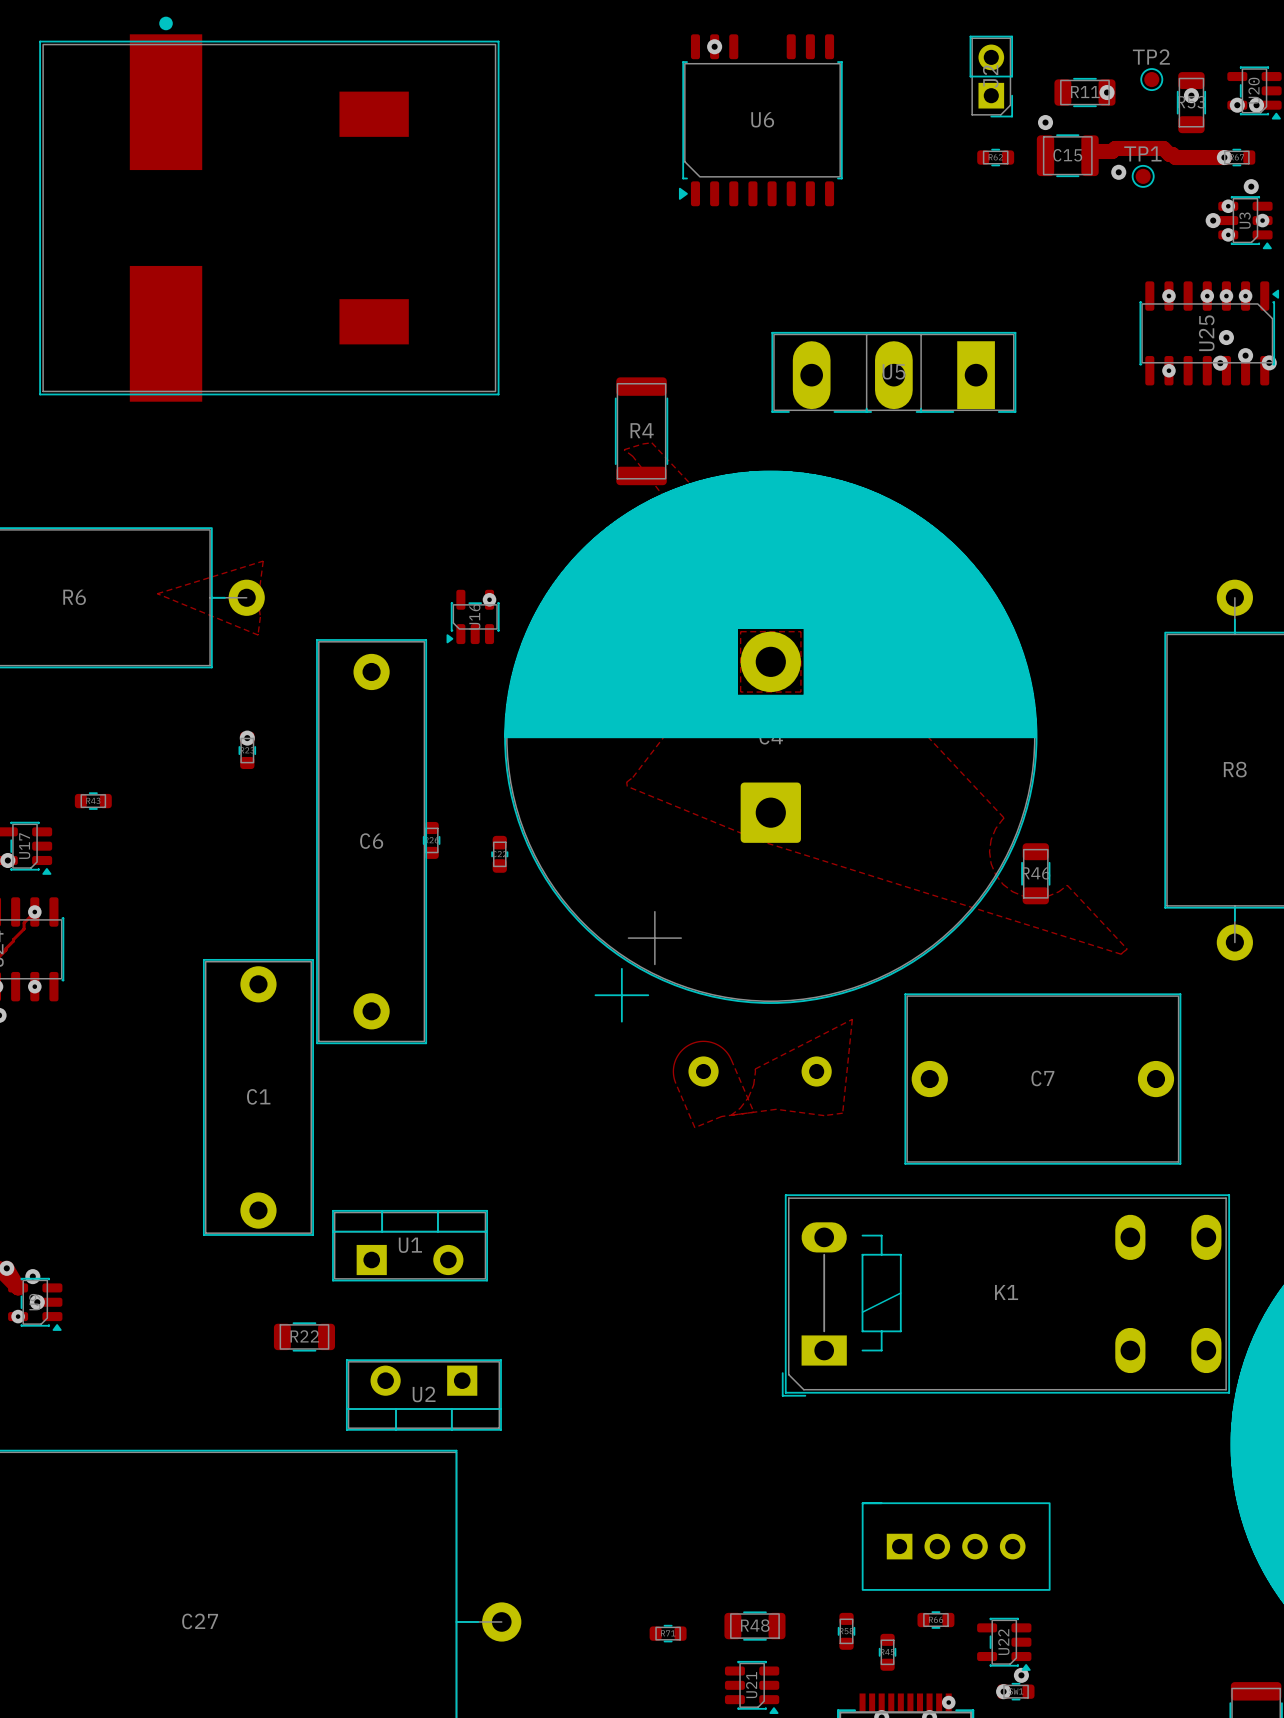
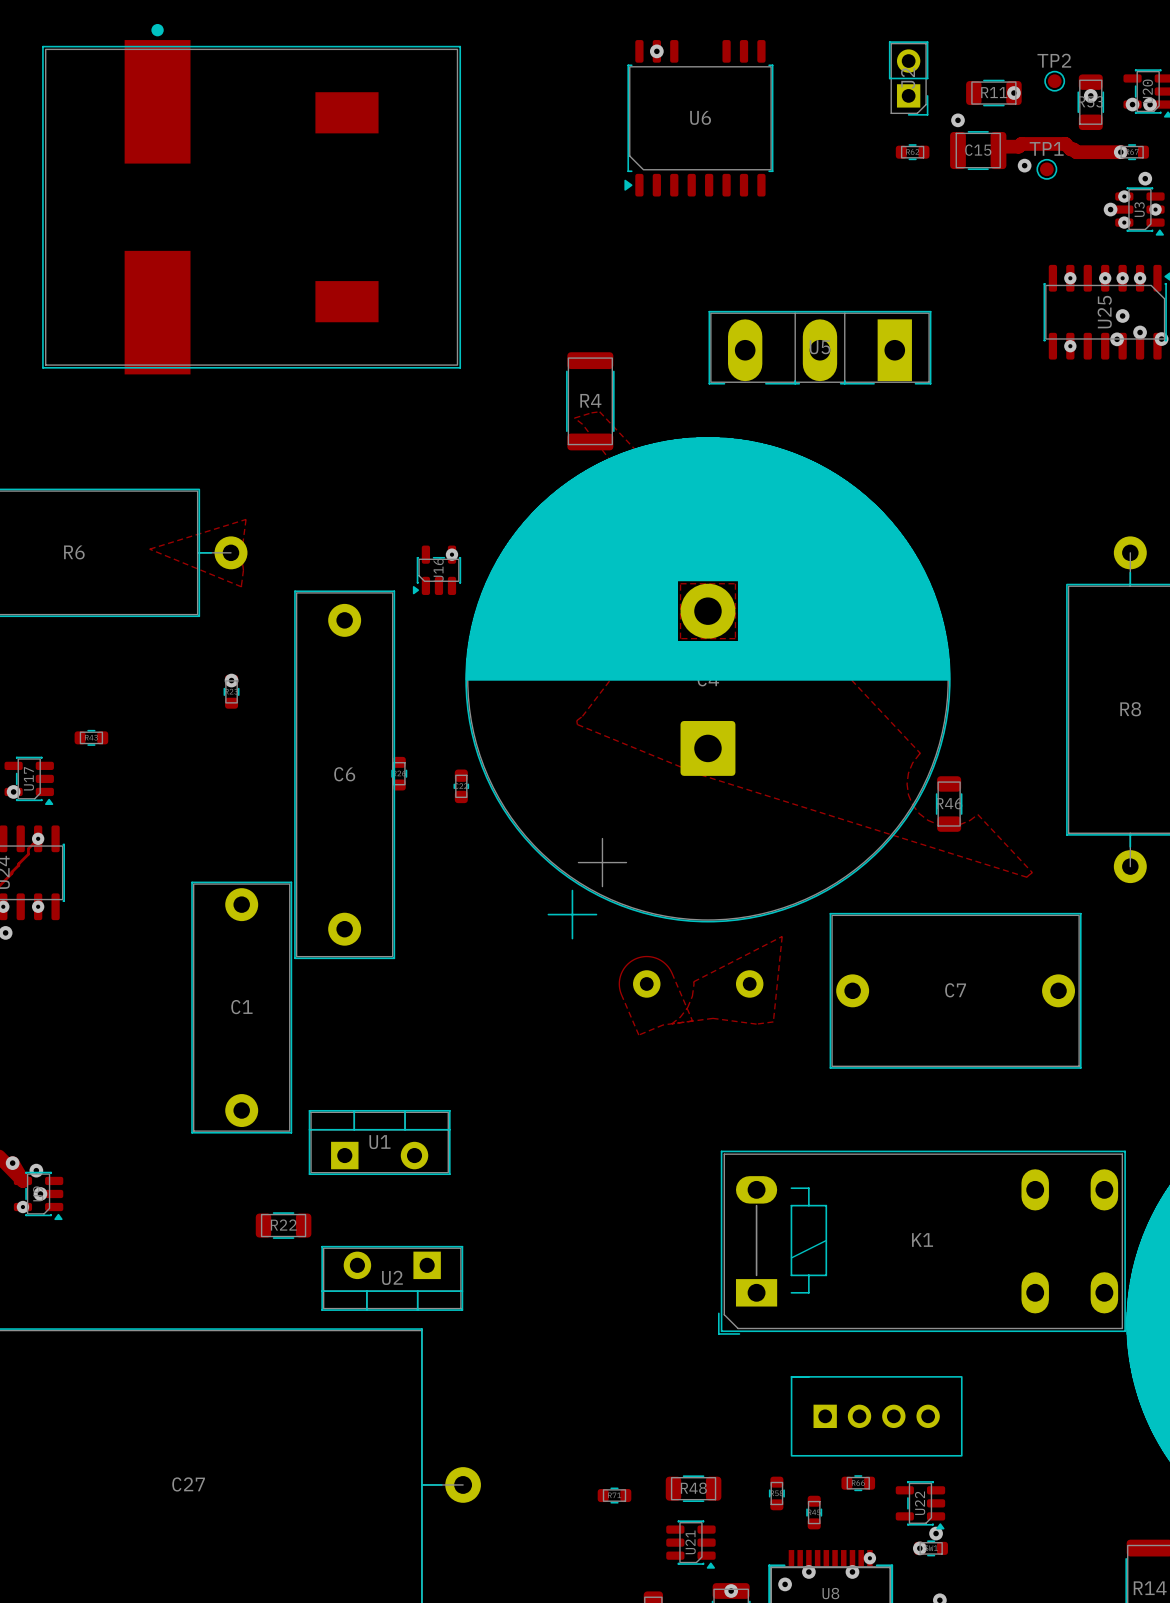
K1 position: (1005, 1295) -> (921, 1242)

